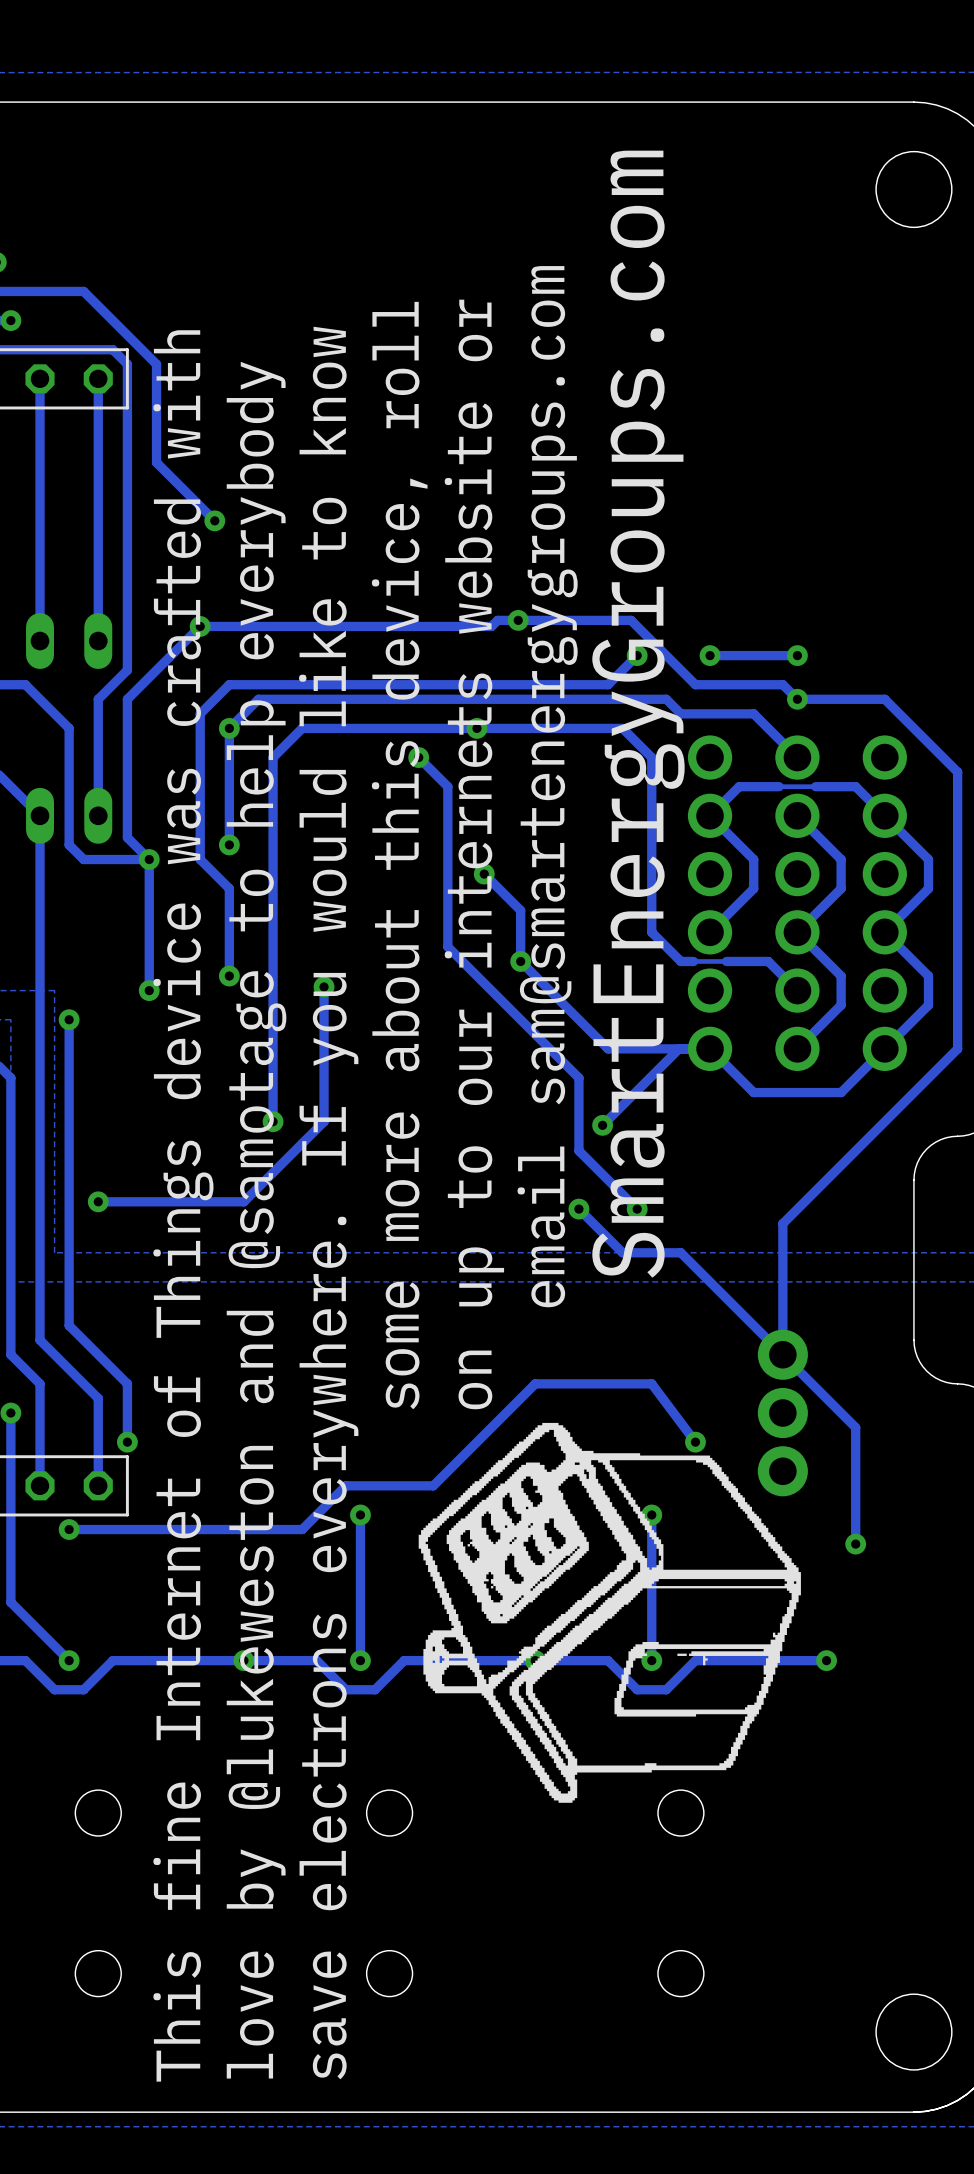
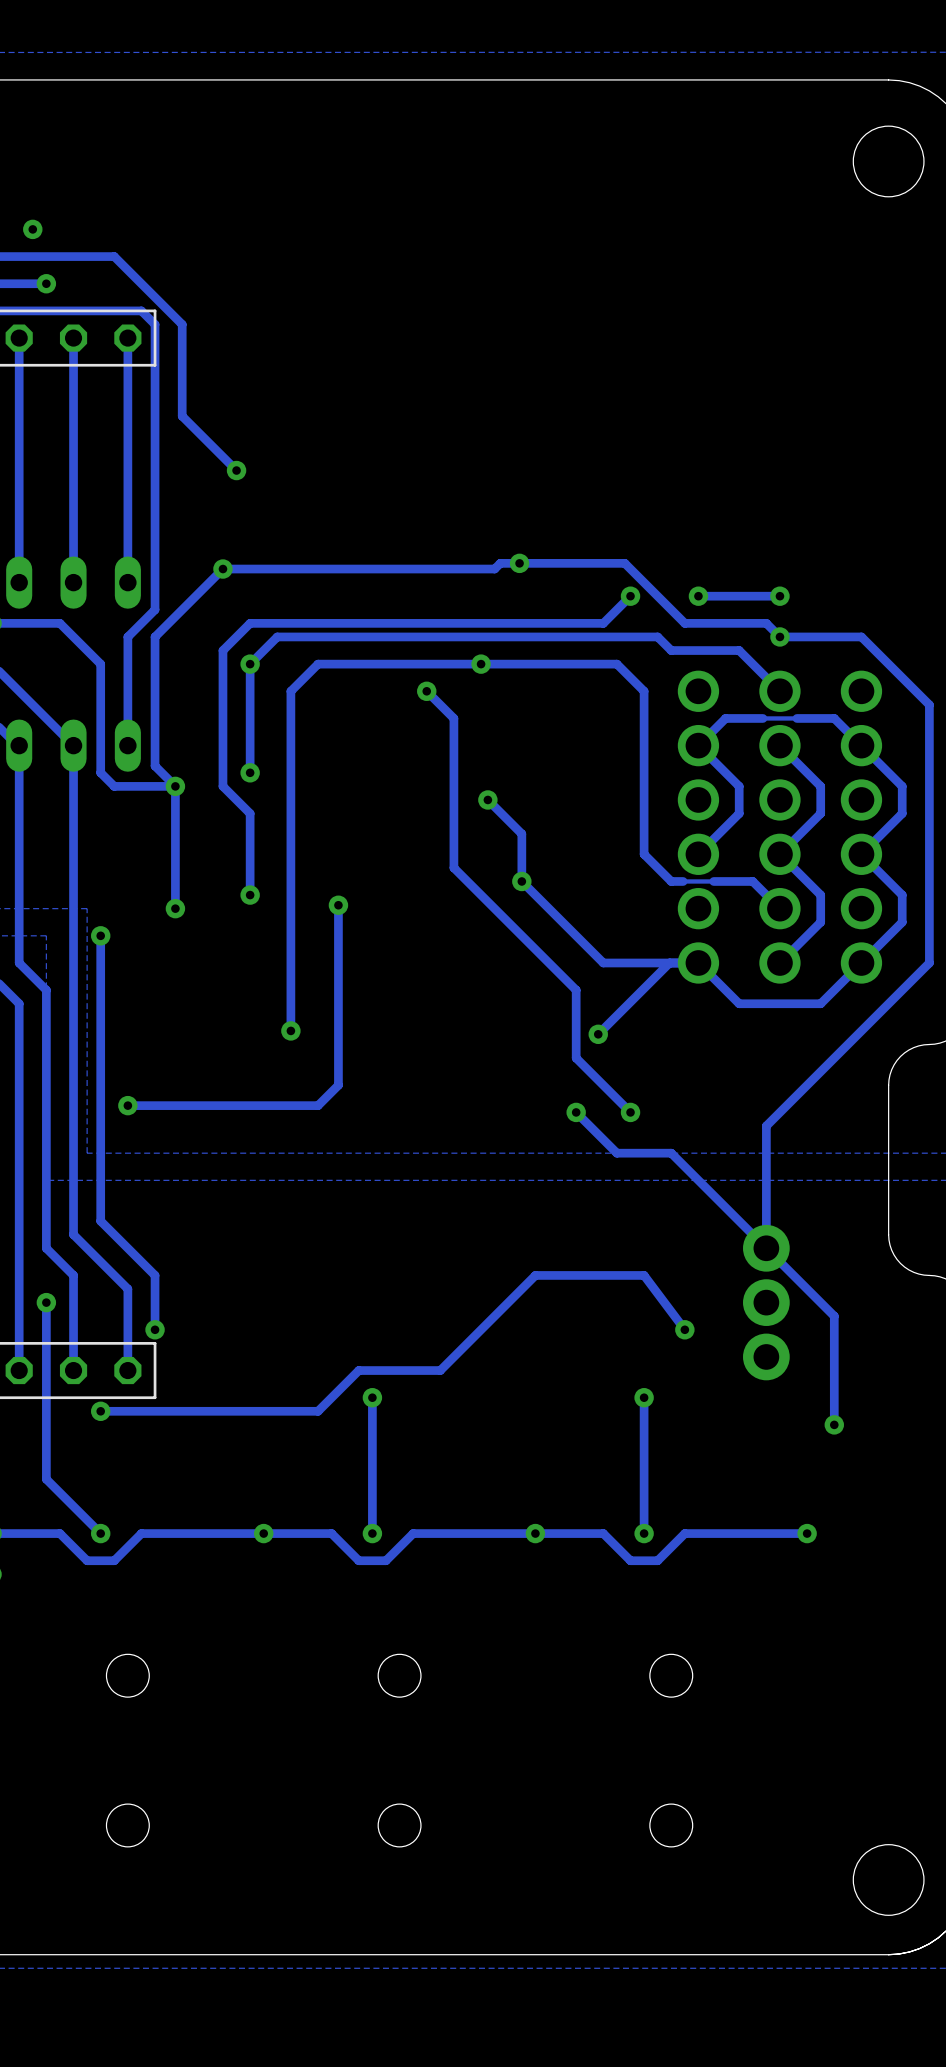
text: SmartEnergyGroups.com (638, 714) -> none
text: email sam@smartenergygroups.com (547, 786) -> none
text: on up to our internets website or (474, 854) -> none
text: some more about this device, roll (399, 855) -> none
track: (324, 1121) (243, 1201) -> (338, 1030) (338, 1085) (318, 1105) (263, 1105)
text: save electrons everywhere. If you would like to know (328, 1203) -> none
text: This fine Internet of Things device was crafted with (183, 1205) -> none
text: love by @lukeweston and @samotage to help everybody (256, 1220) -> none
drawing: [418, 1422, 801, 1803] -> none

